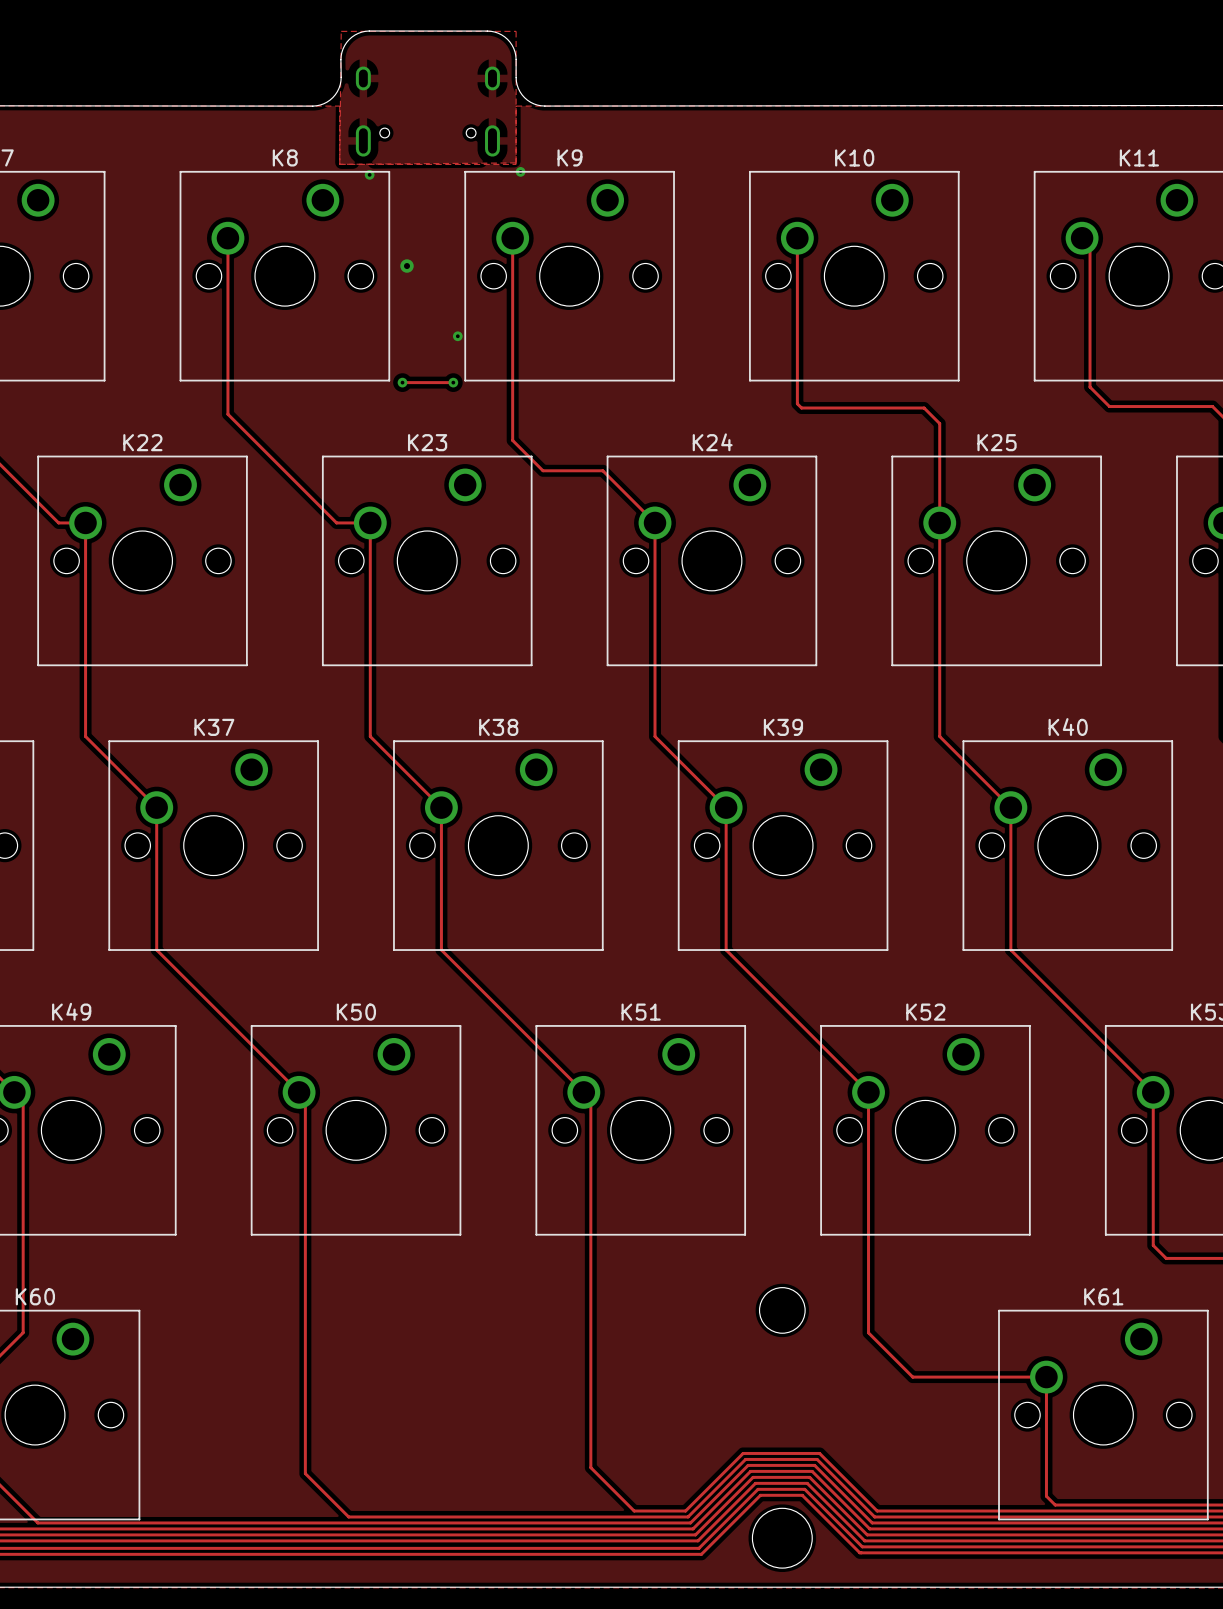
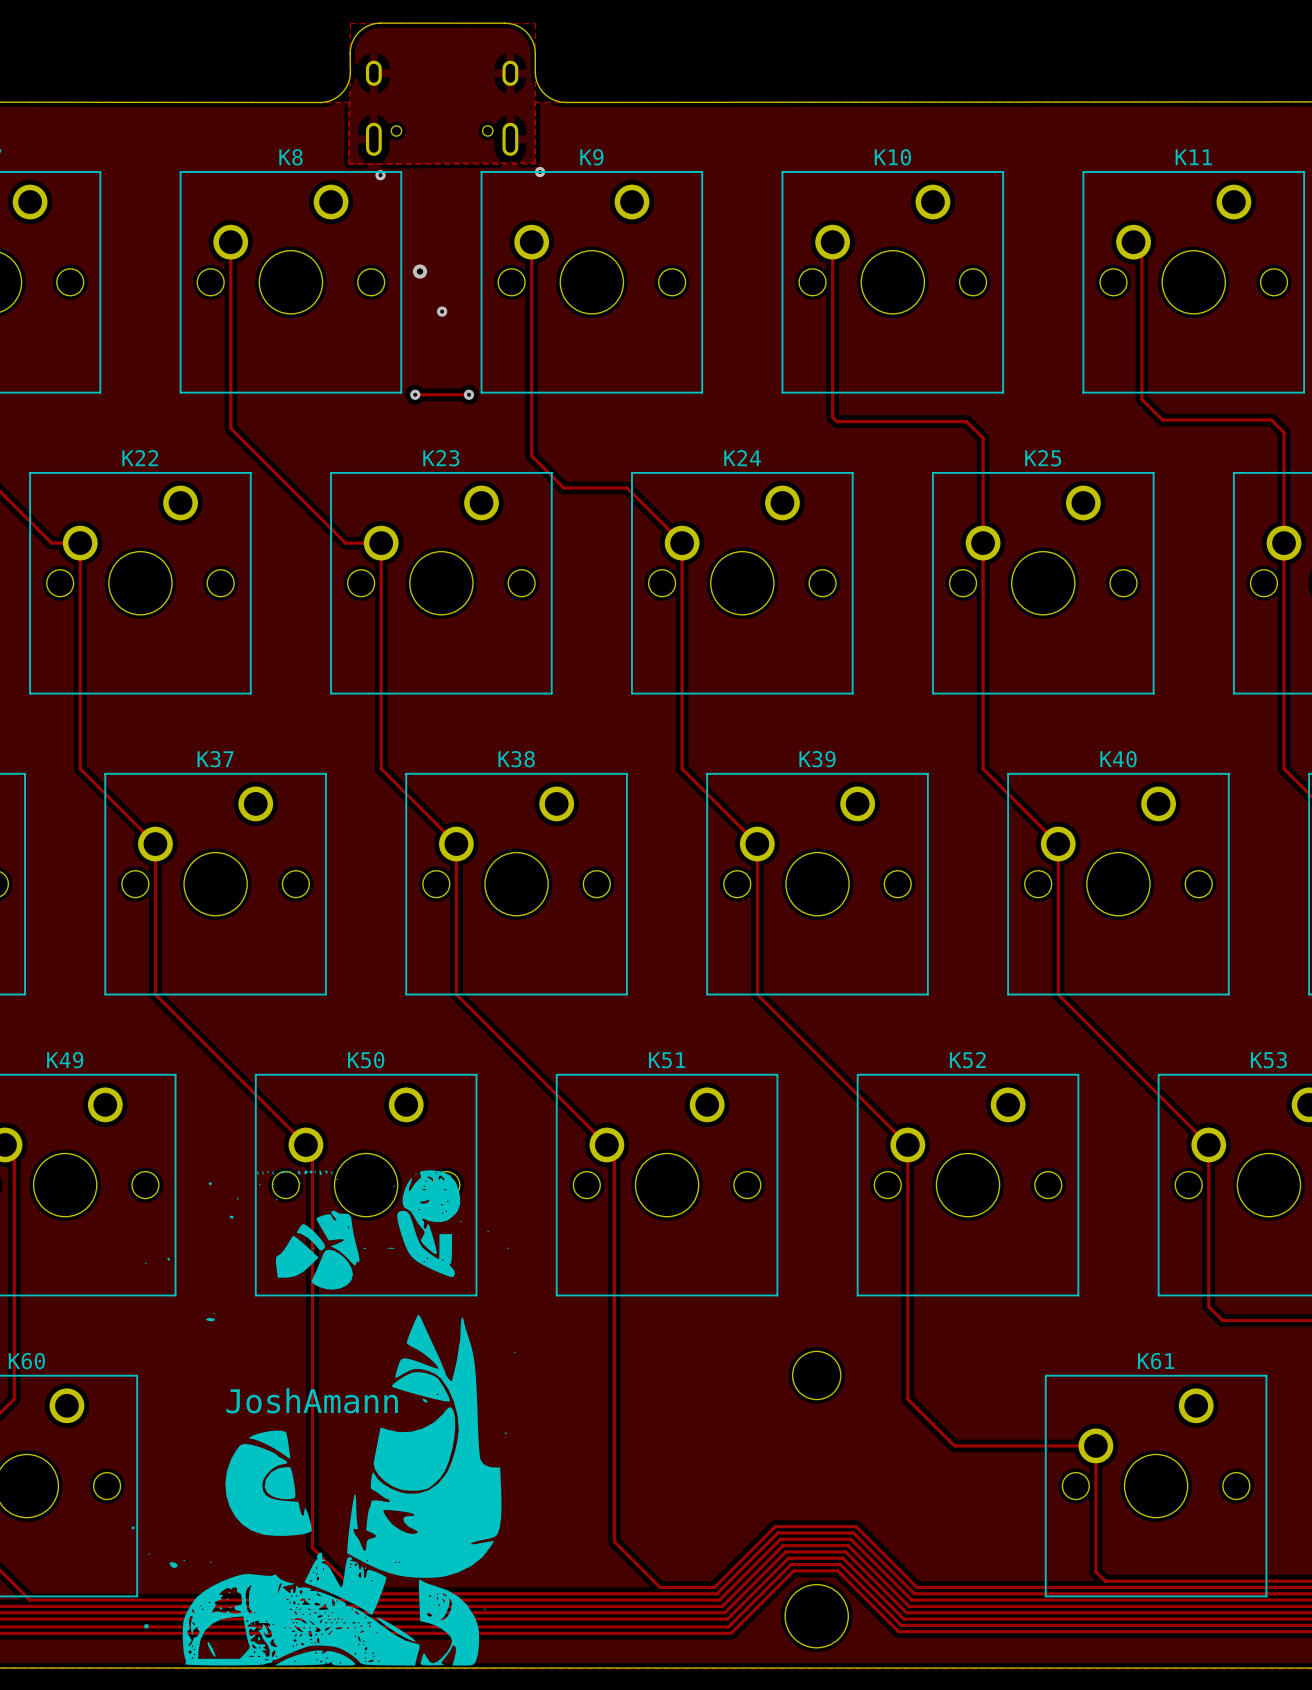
via position: (457, 336) -> (442, 311)
JoshAmann: none -> (323, 1417)

